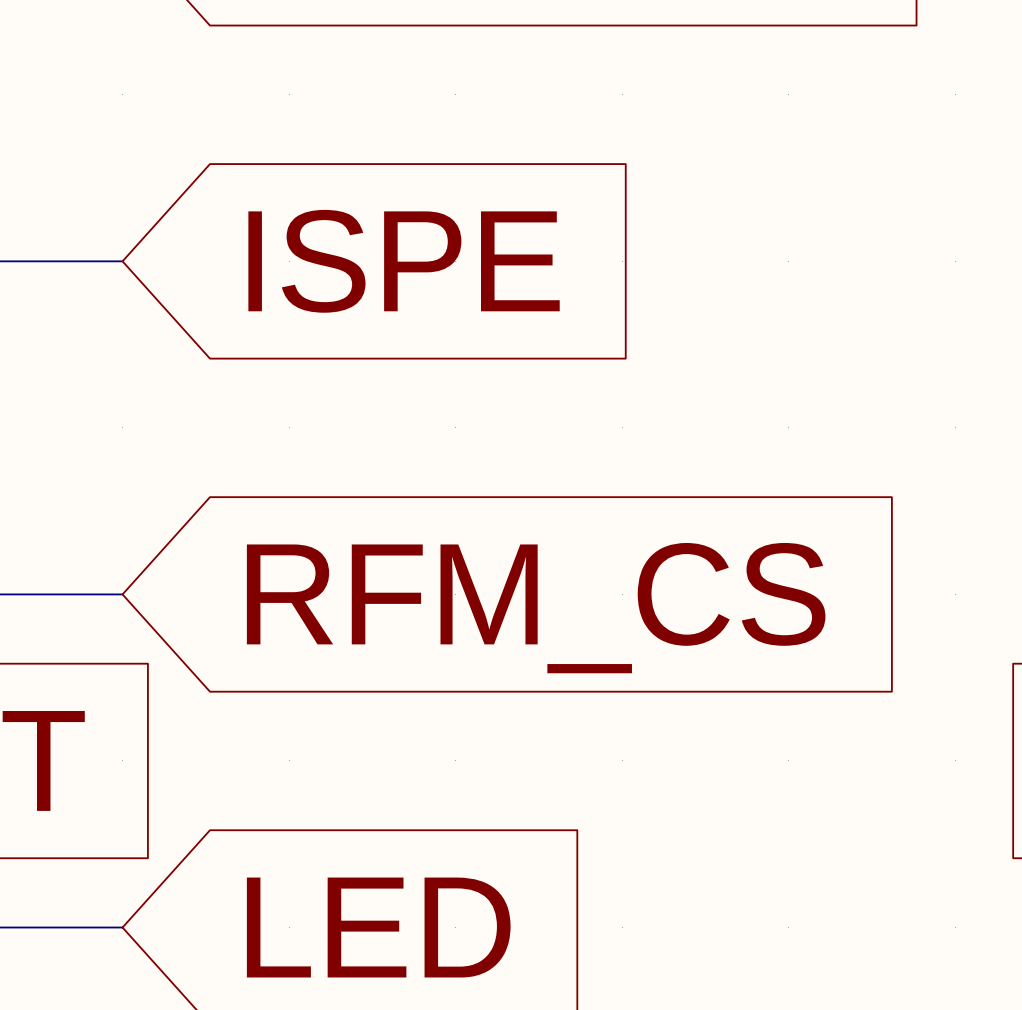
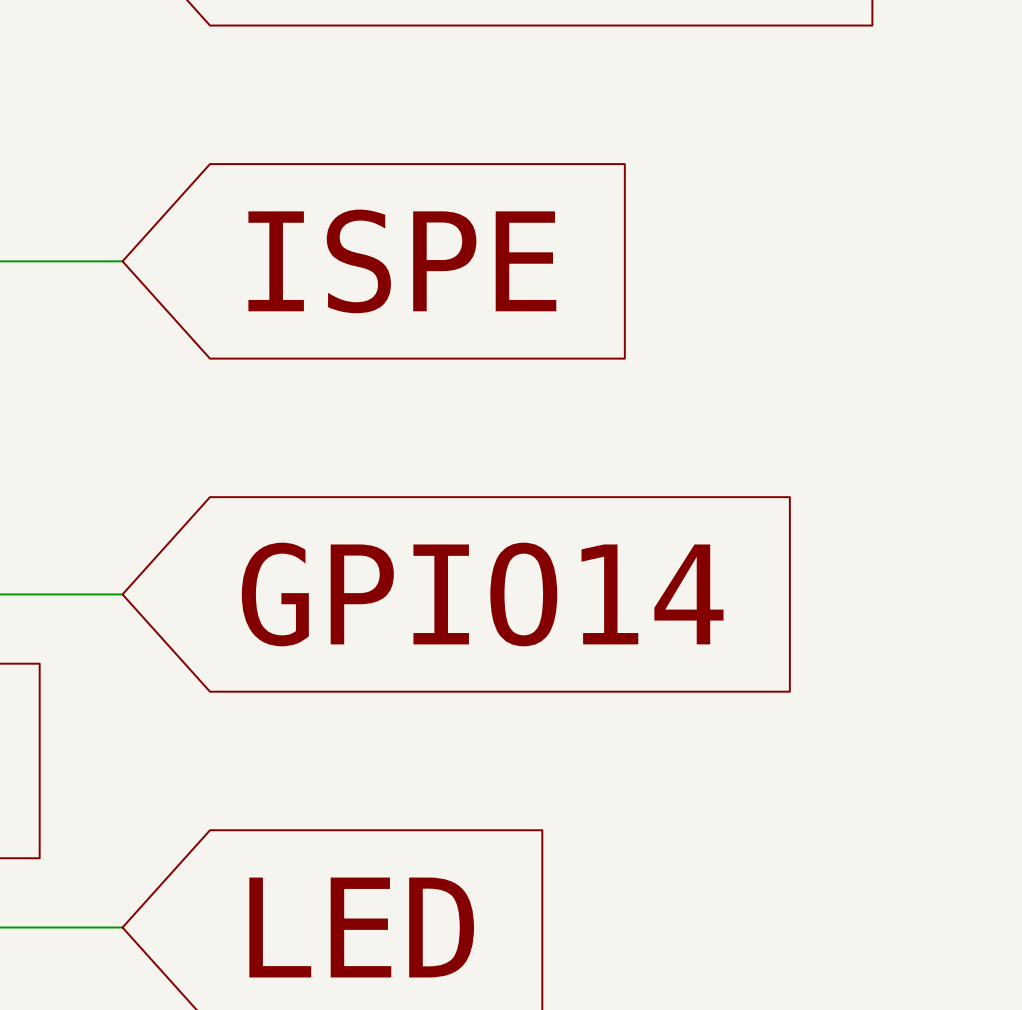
global label: RFM_CS (536, 608) -> GPIO14 (482, 594)

